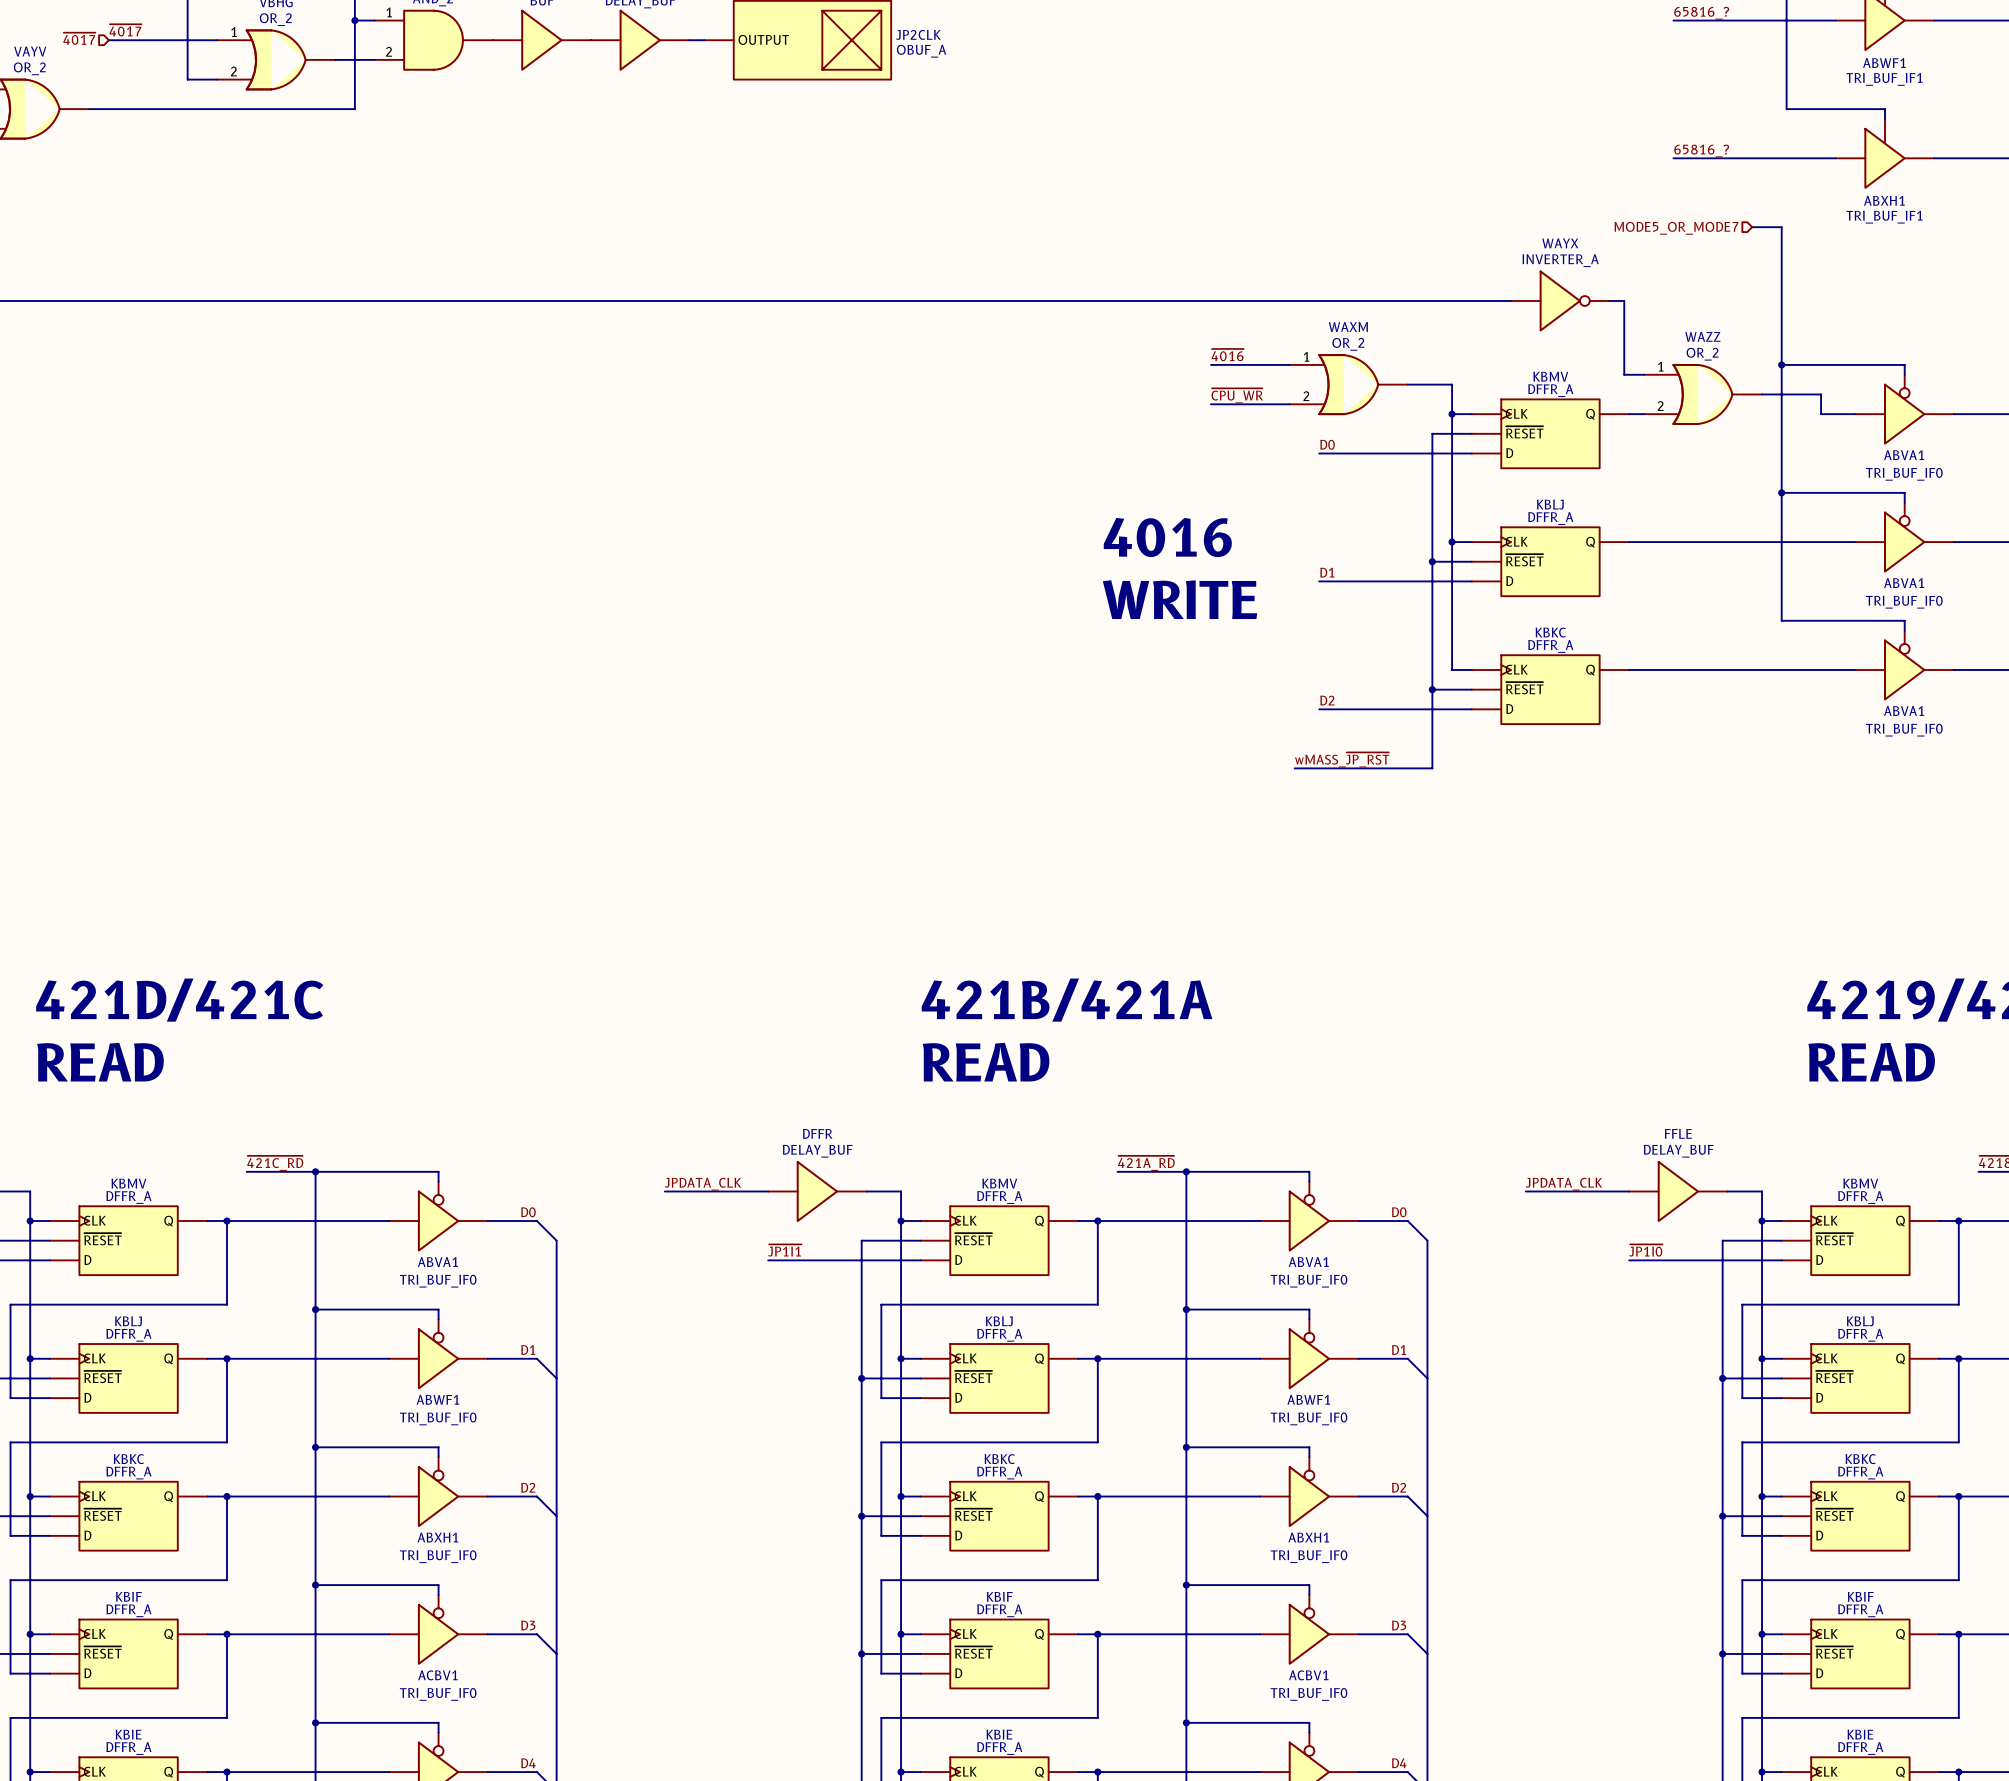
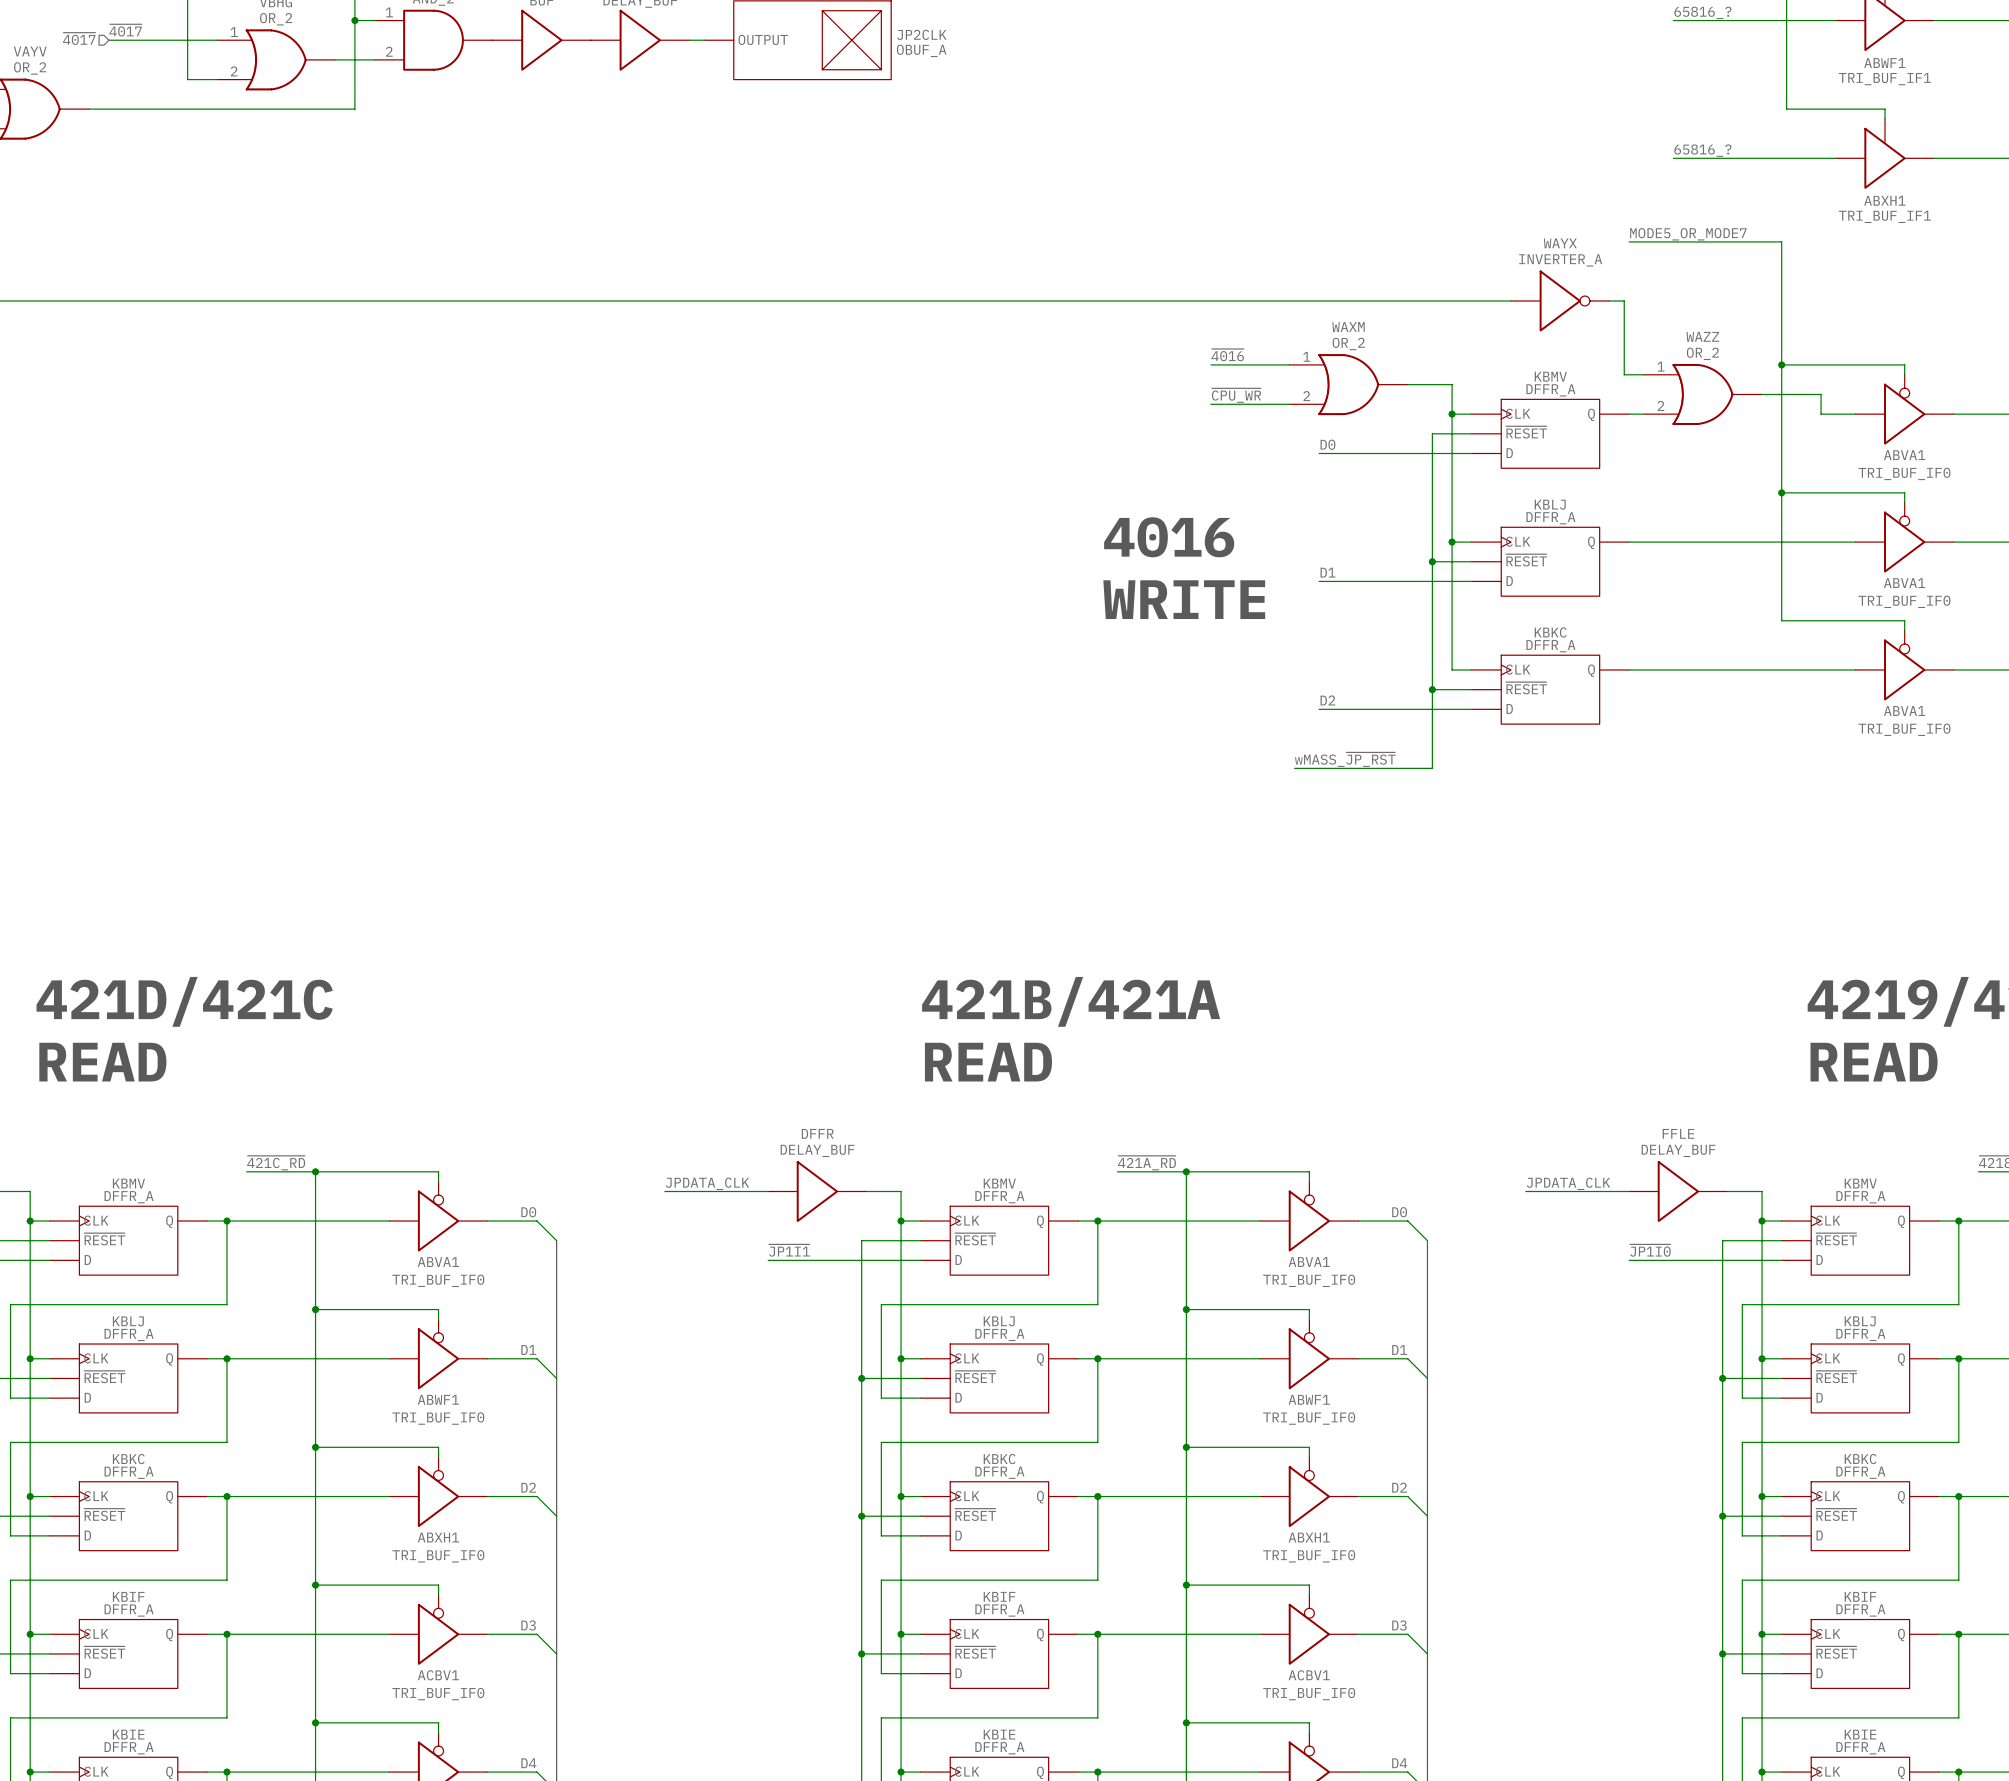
wire: (1752, 227) (1781, 227) (1781, 241) -> (1629, 241) (1781, 241)
hierarchical label: MODE5_OR_MODE7 (1676, 228) -> none
label: none -> MODE5_OR_MODE7 (1688, 234)

